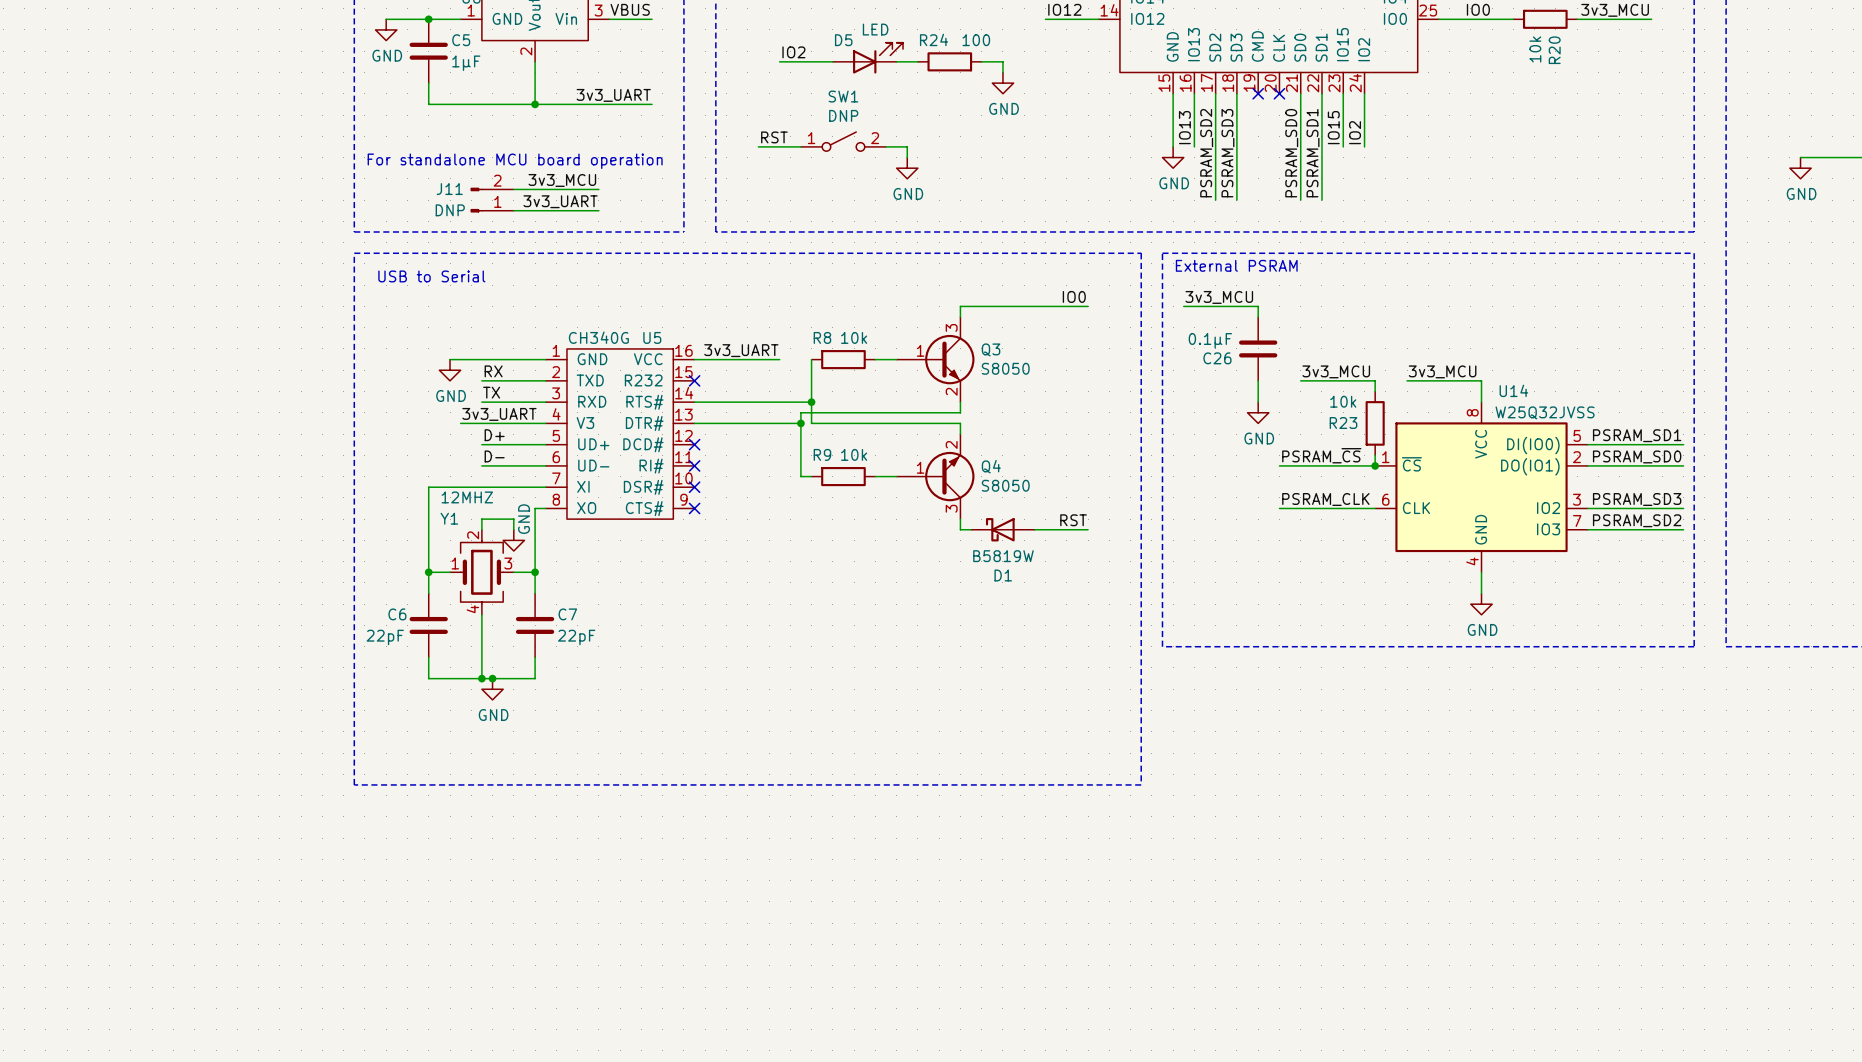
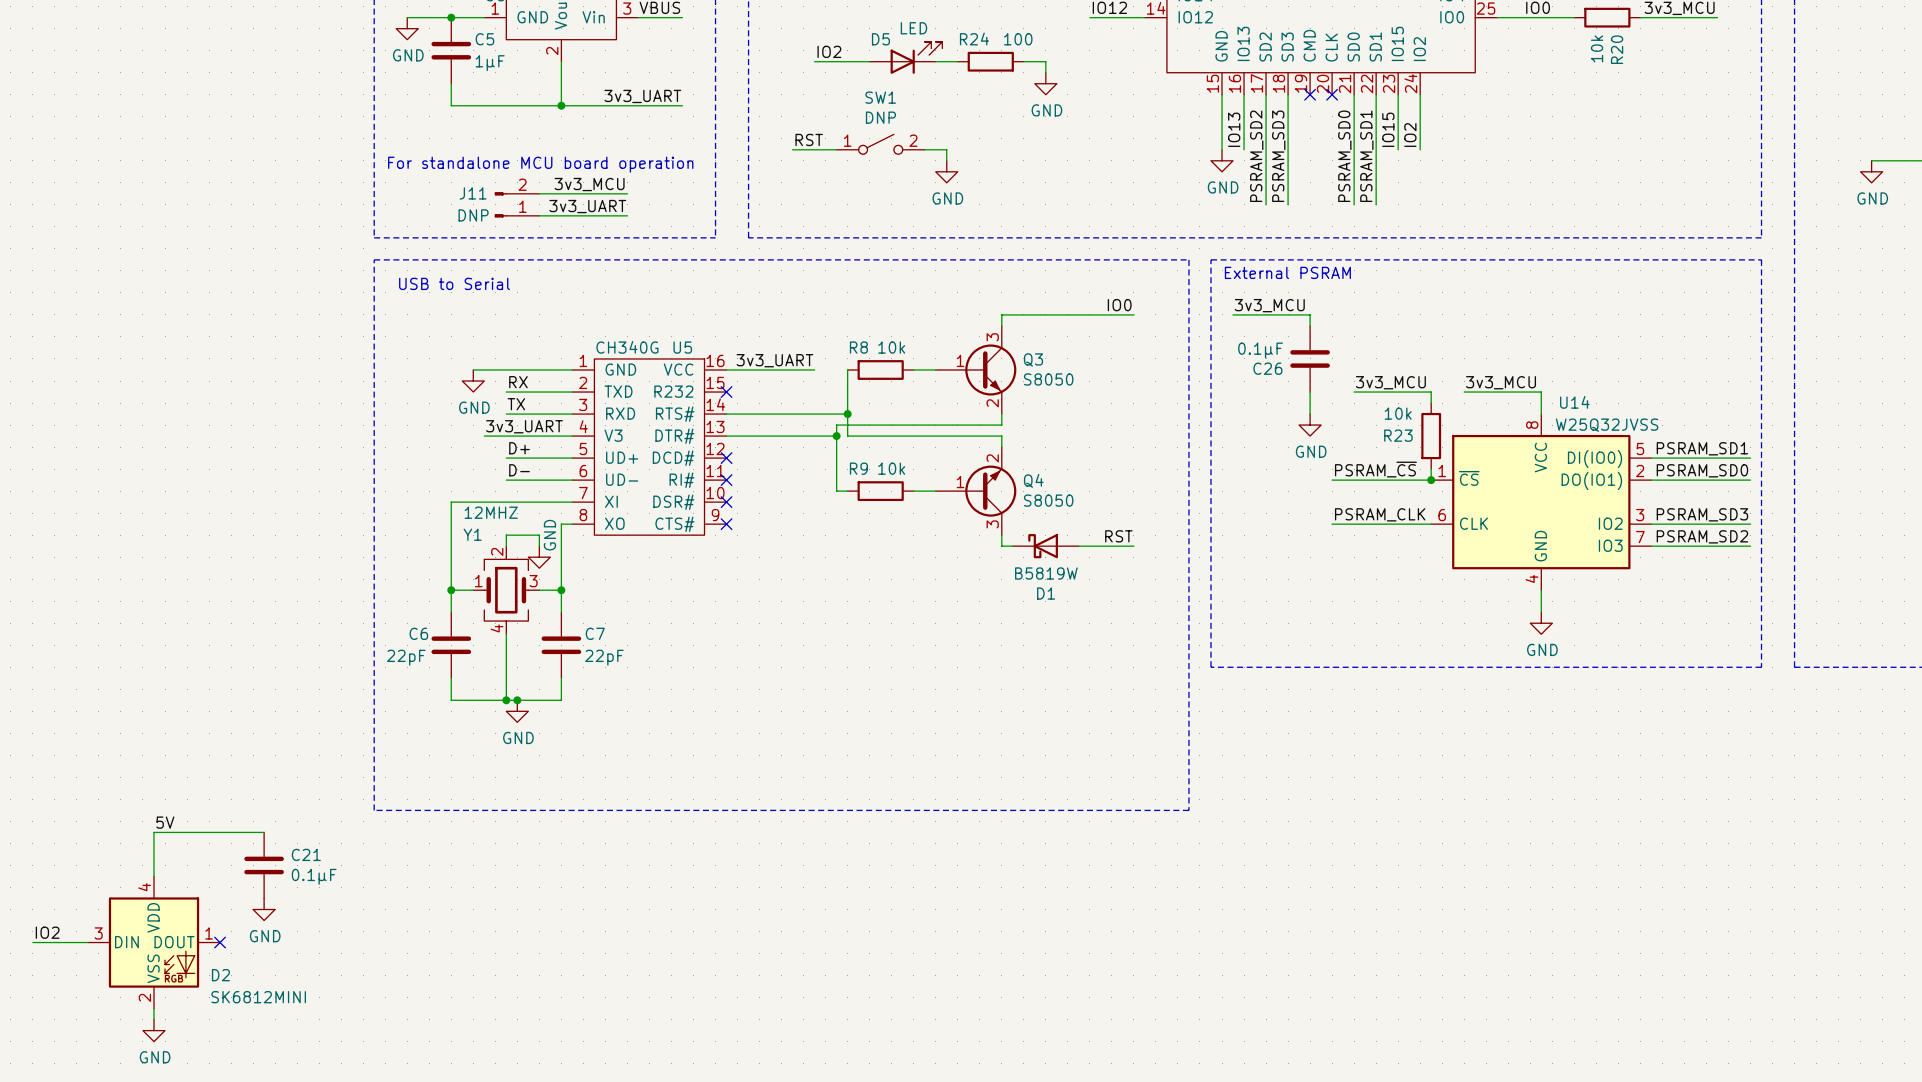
label: none -> 5V (165, 822)
wire: none -> (264, 832) (154, 832) (154, 876)
C21: none -> 0.1µF (264, 865)
power symbol: none -> GND (264, 909)
label: none -> IO2 (47, 932)
wire: none -> (32, 942) (87, 942)
D2: none -> SK6812MINI (154, 942)
no-connect mark: none -> (220, 942)
wire: none -> (154, 1008) (154, 1019)
power symbol: none -> GND (154, 1030)

